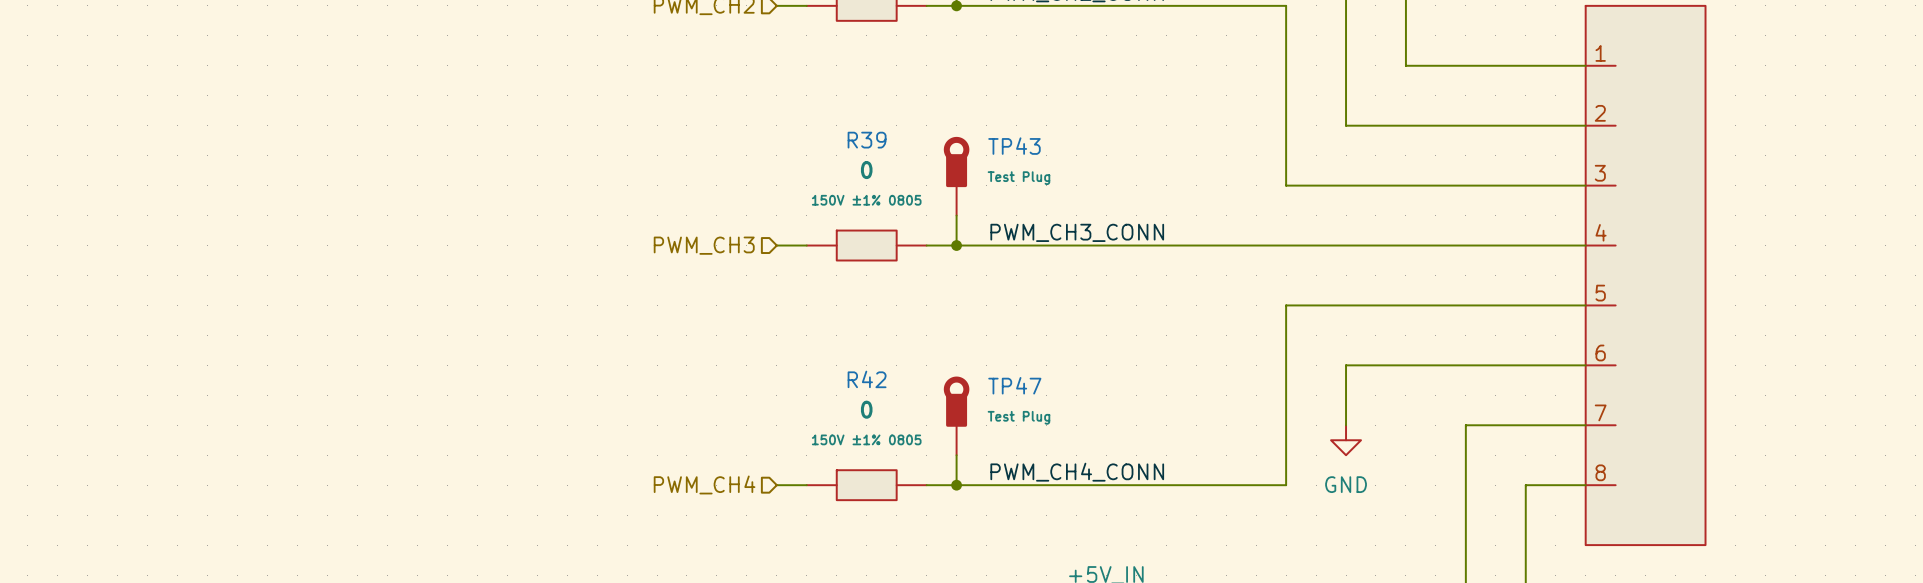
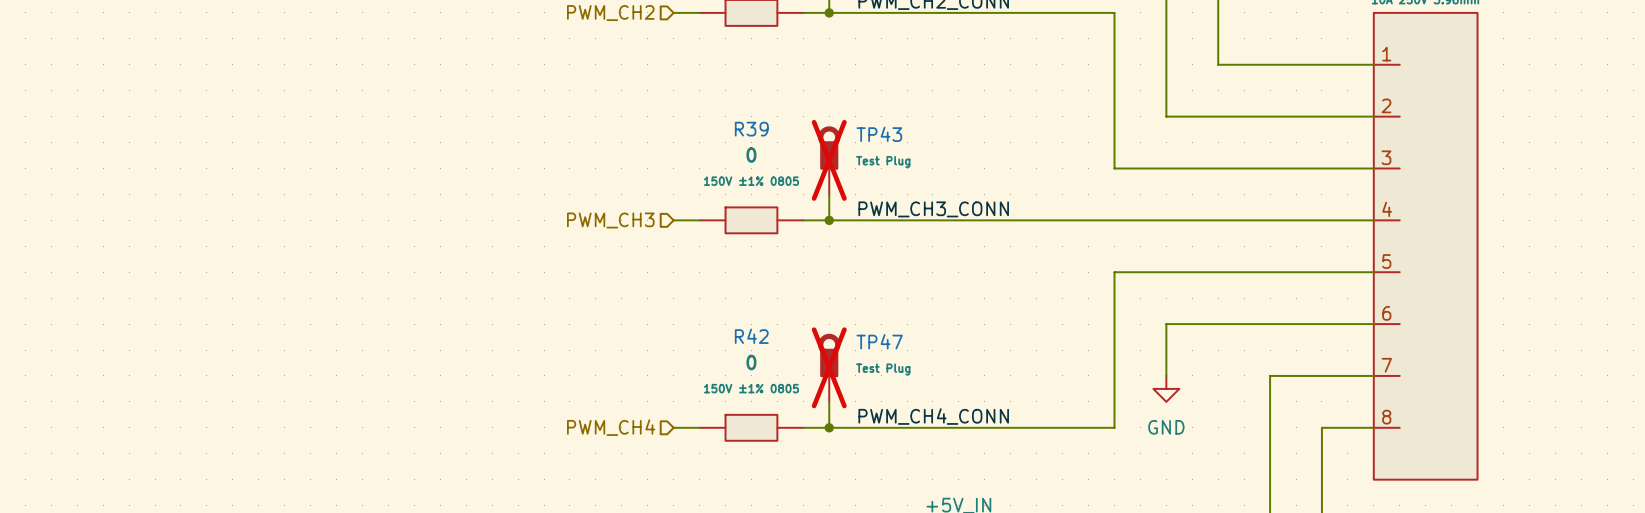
TP43 do-not-place cross: none -> (829, 160)
TP47 do-not-place cross: none -> (829, 367)

